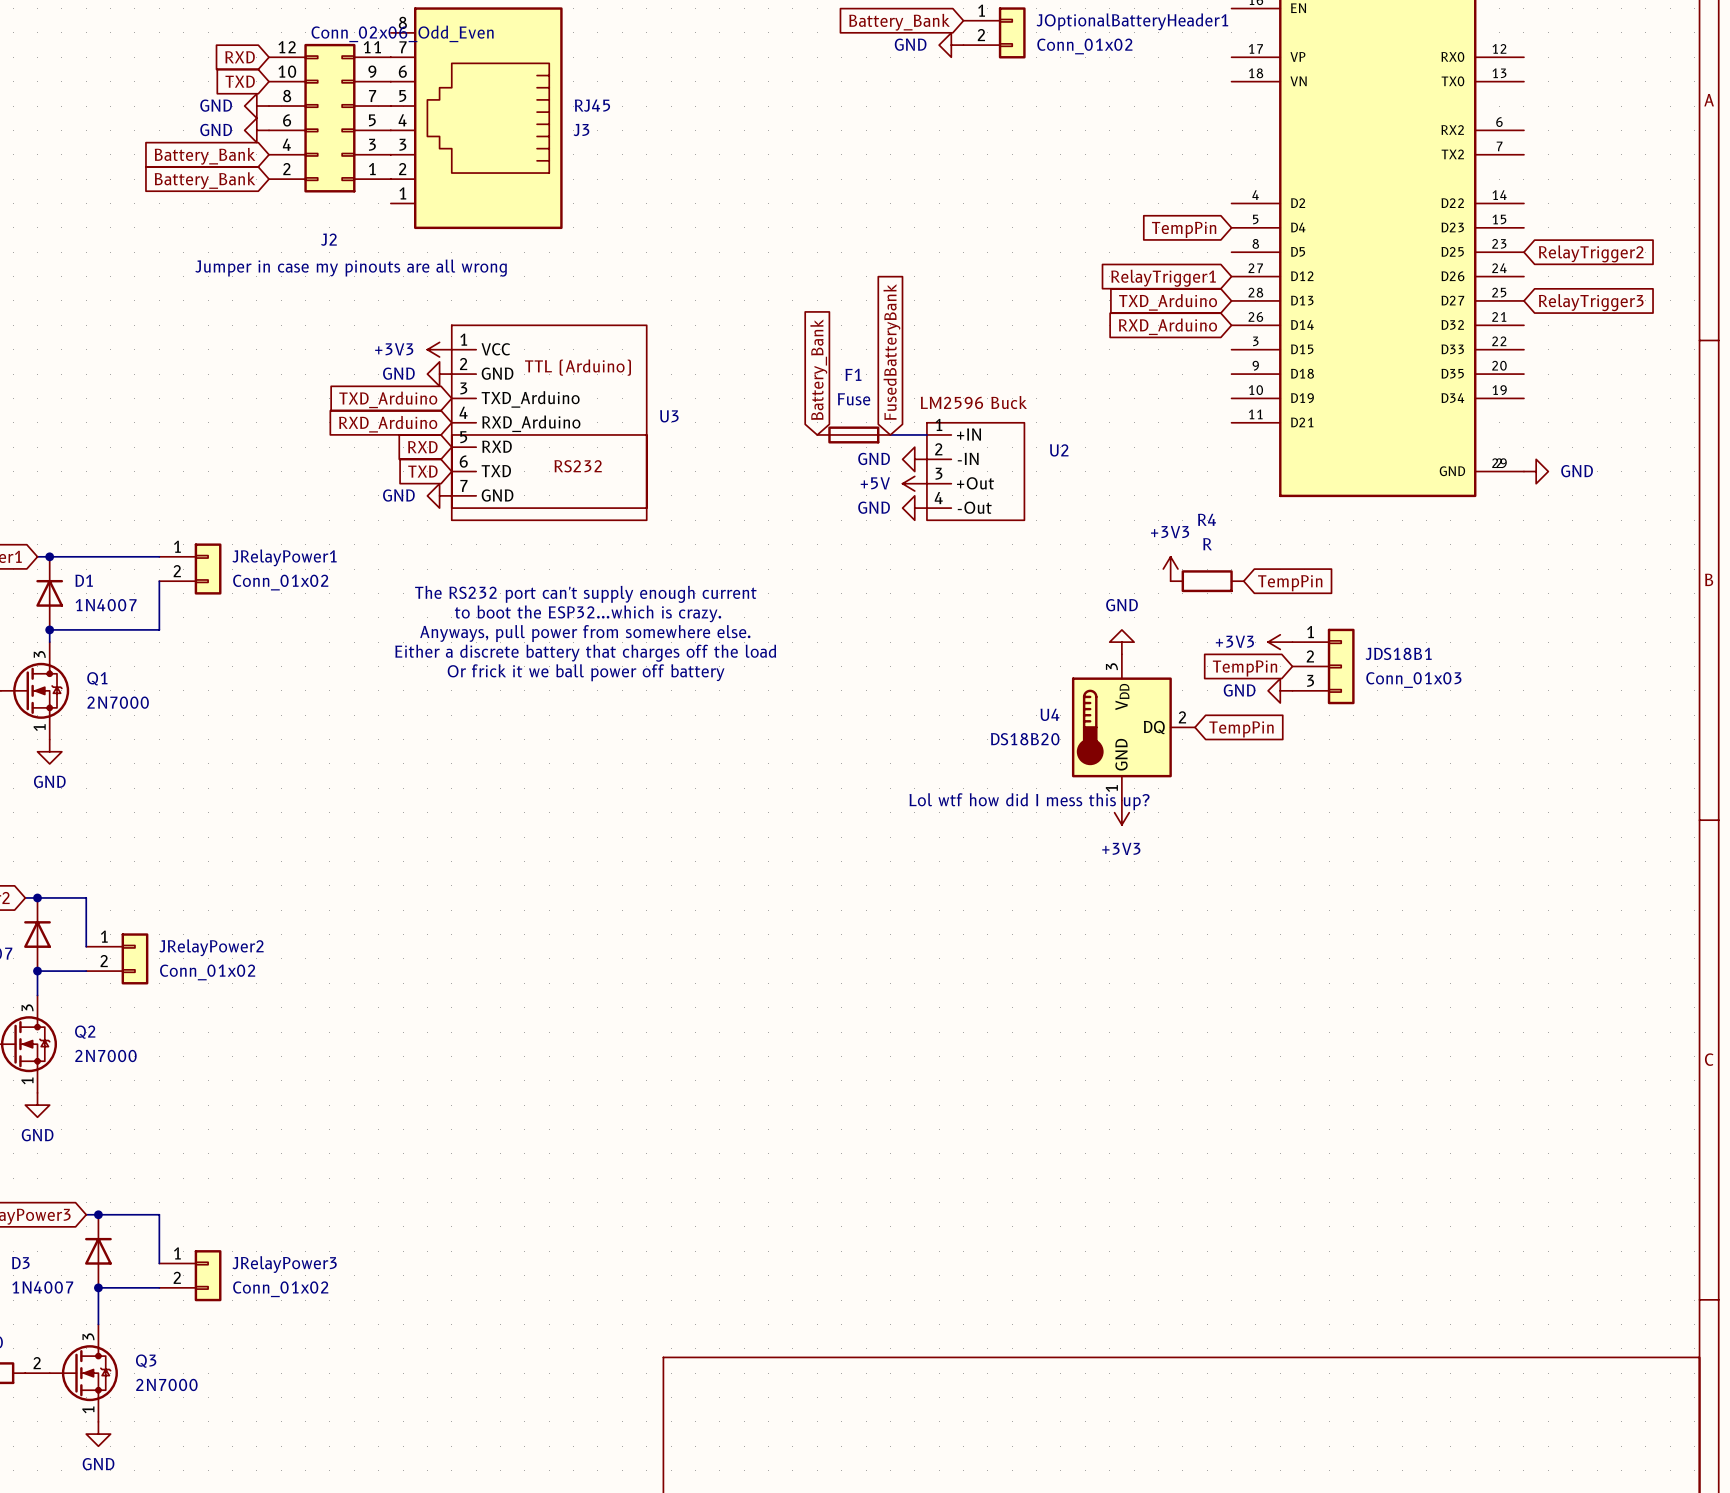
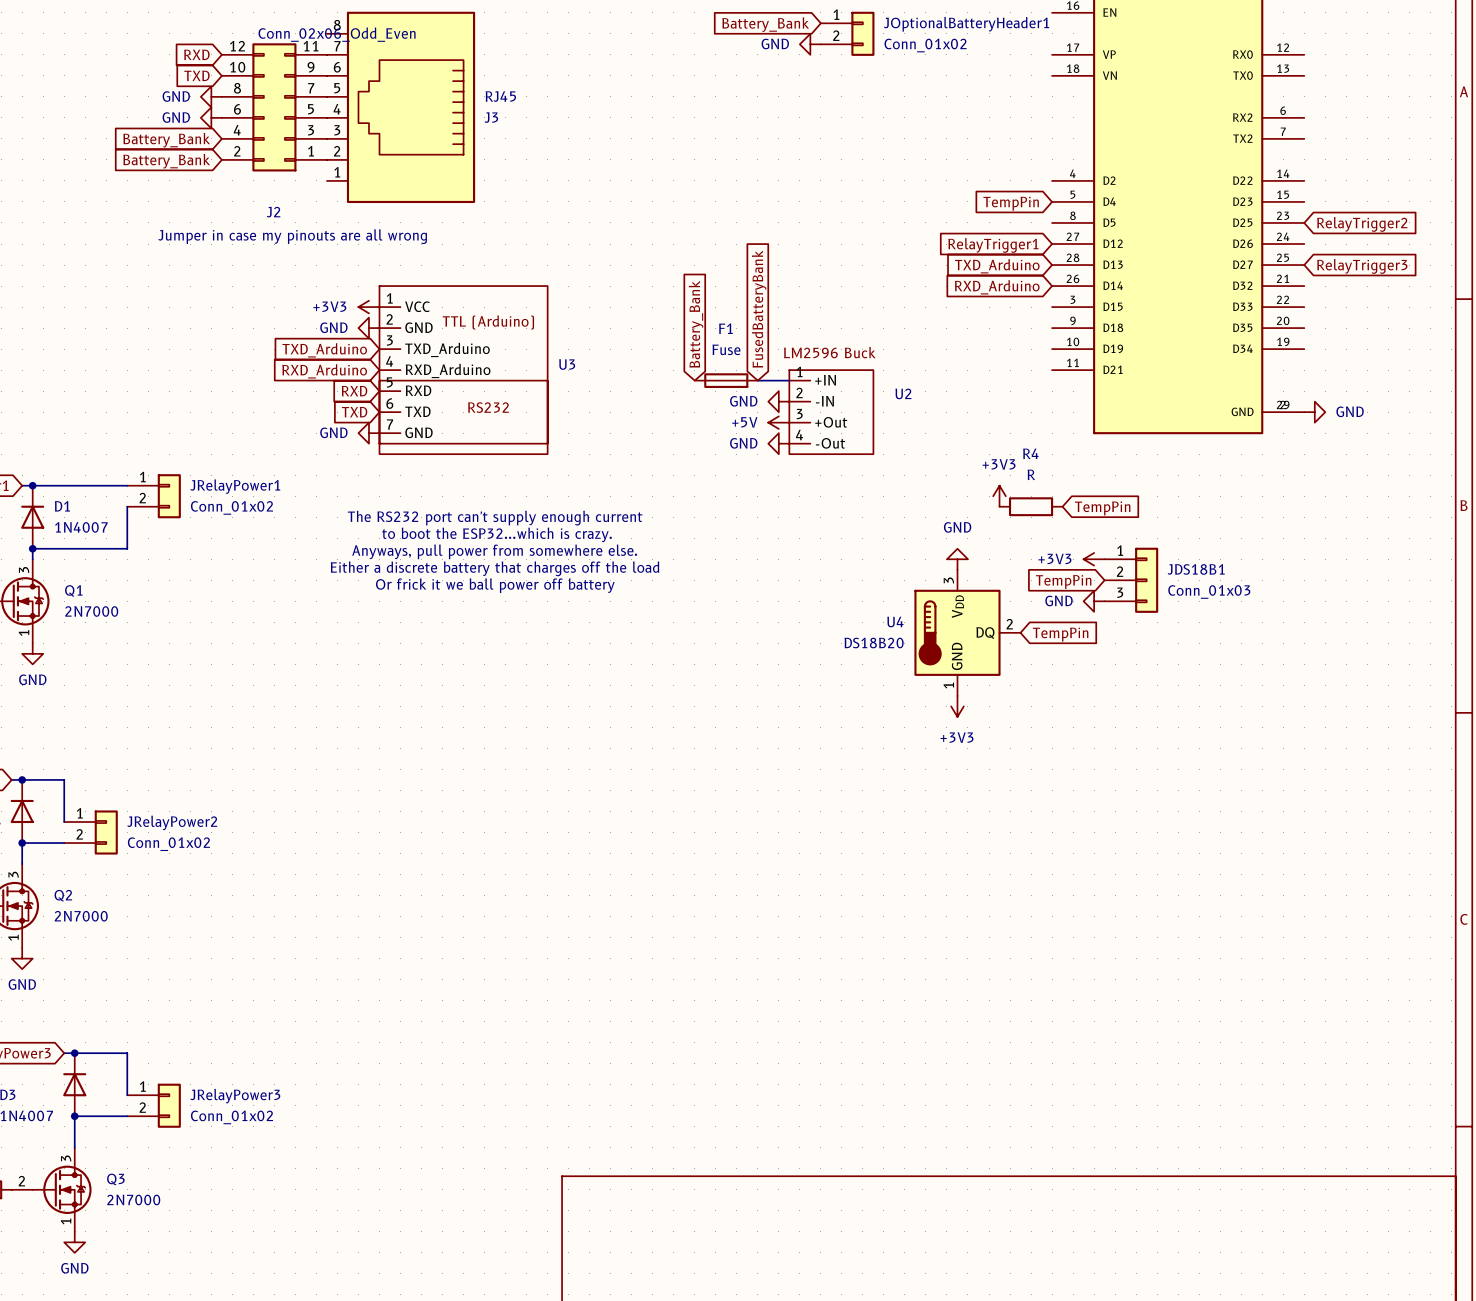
text: Lol wtf how did I mess this up? (1029, 801) -> none

